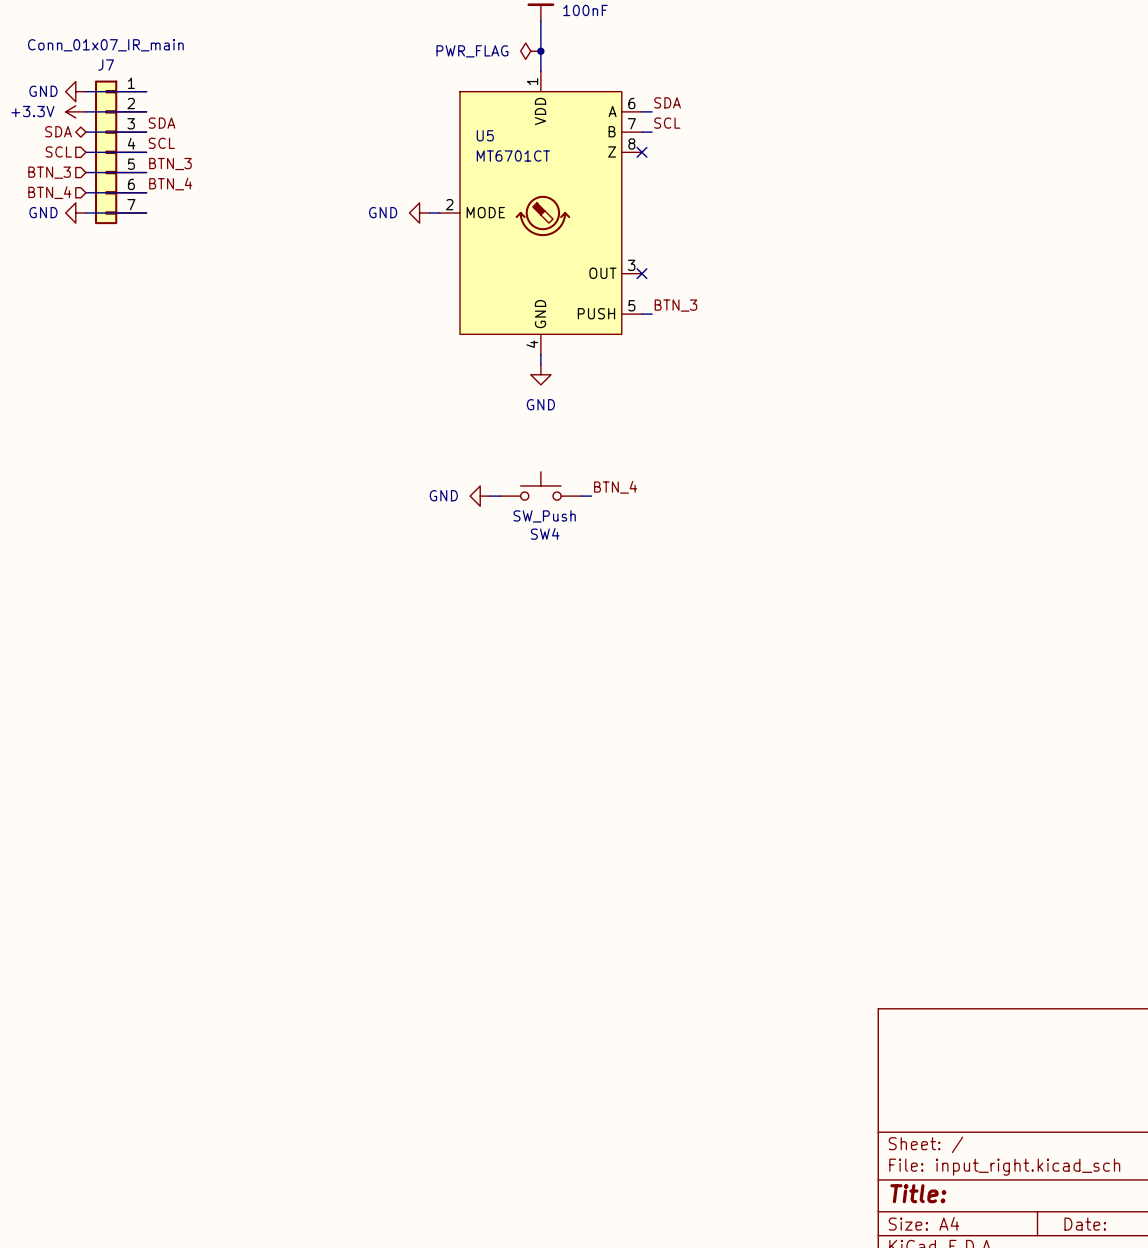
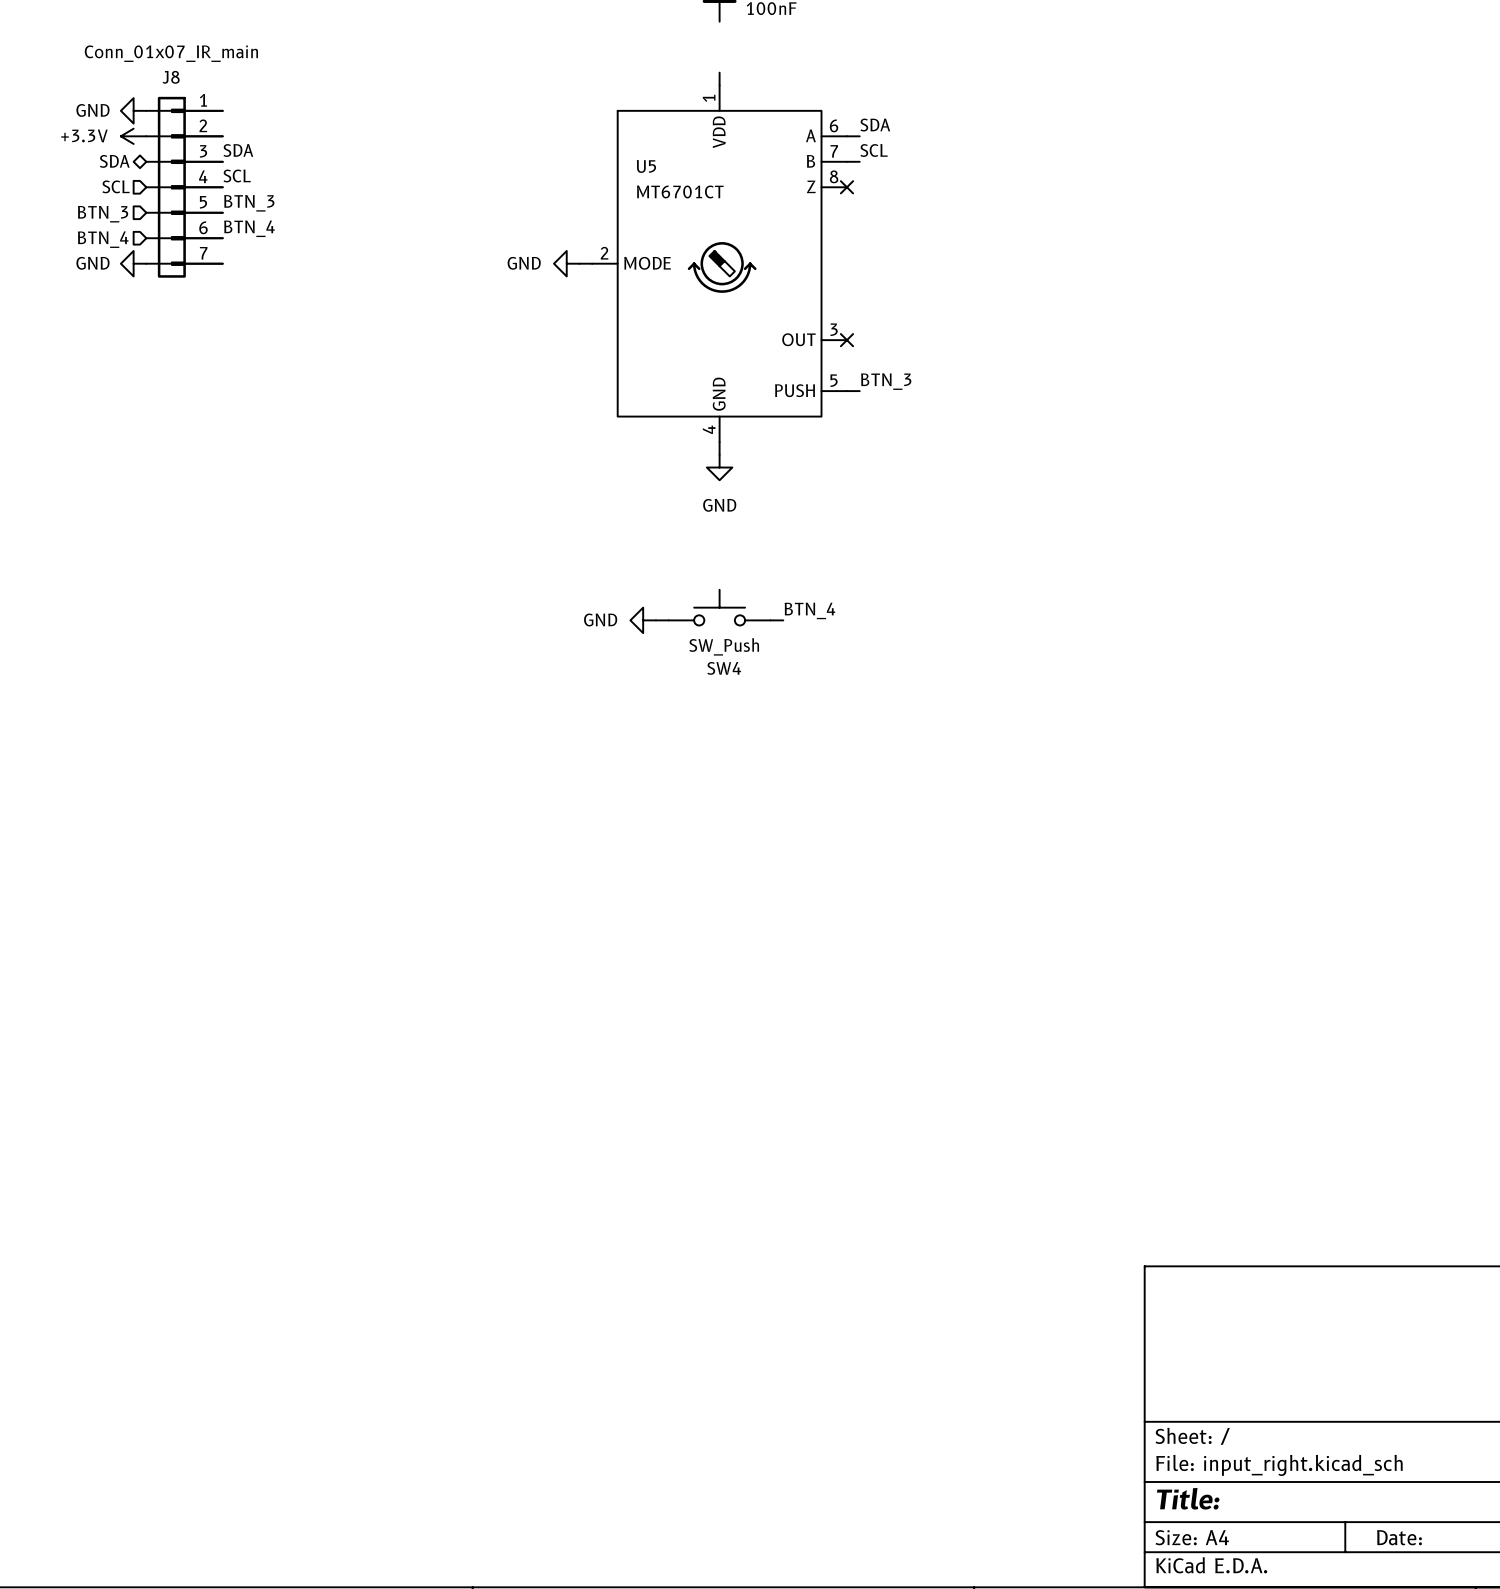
wire: (540, 20) (540, 61) -> none
power symbol: PWR_FLAG (530, 51) -> none
junction: (540, 51) -> none
J7 name: J7 (106, 65) -> J8 (171, 77)

